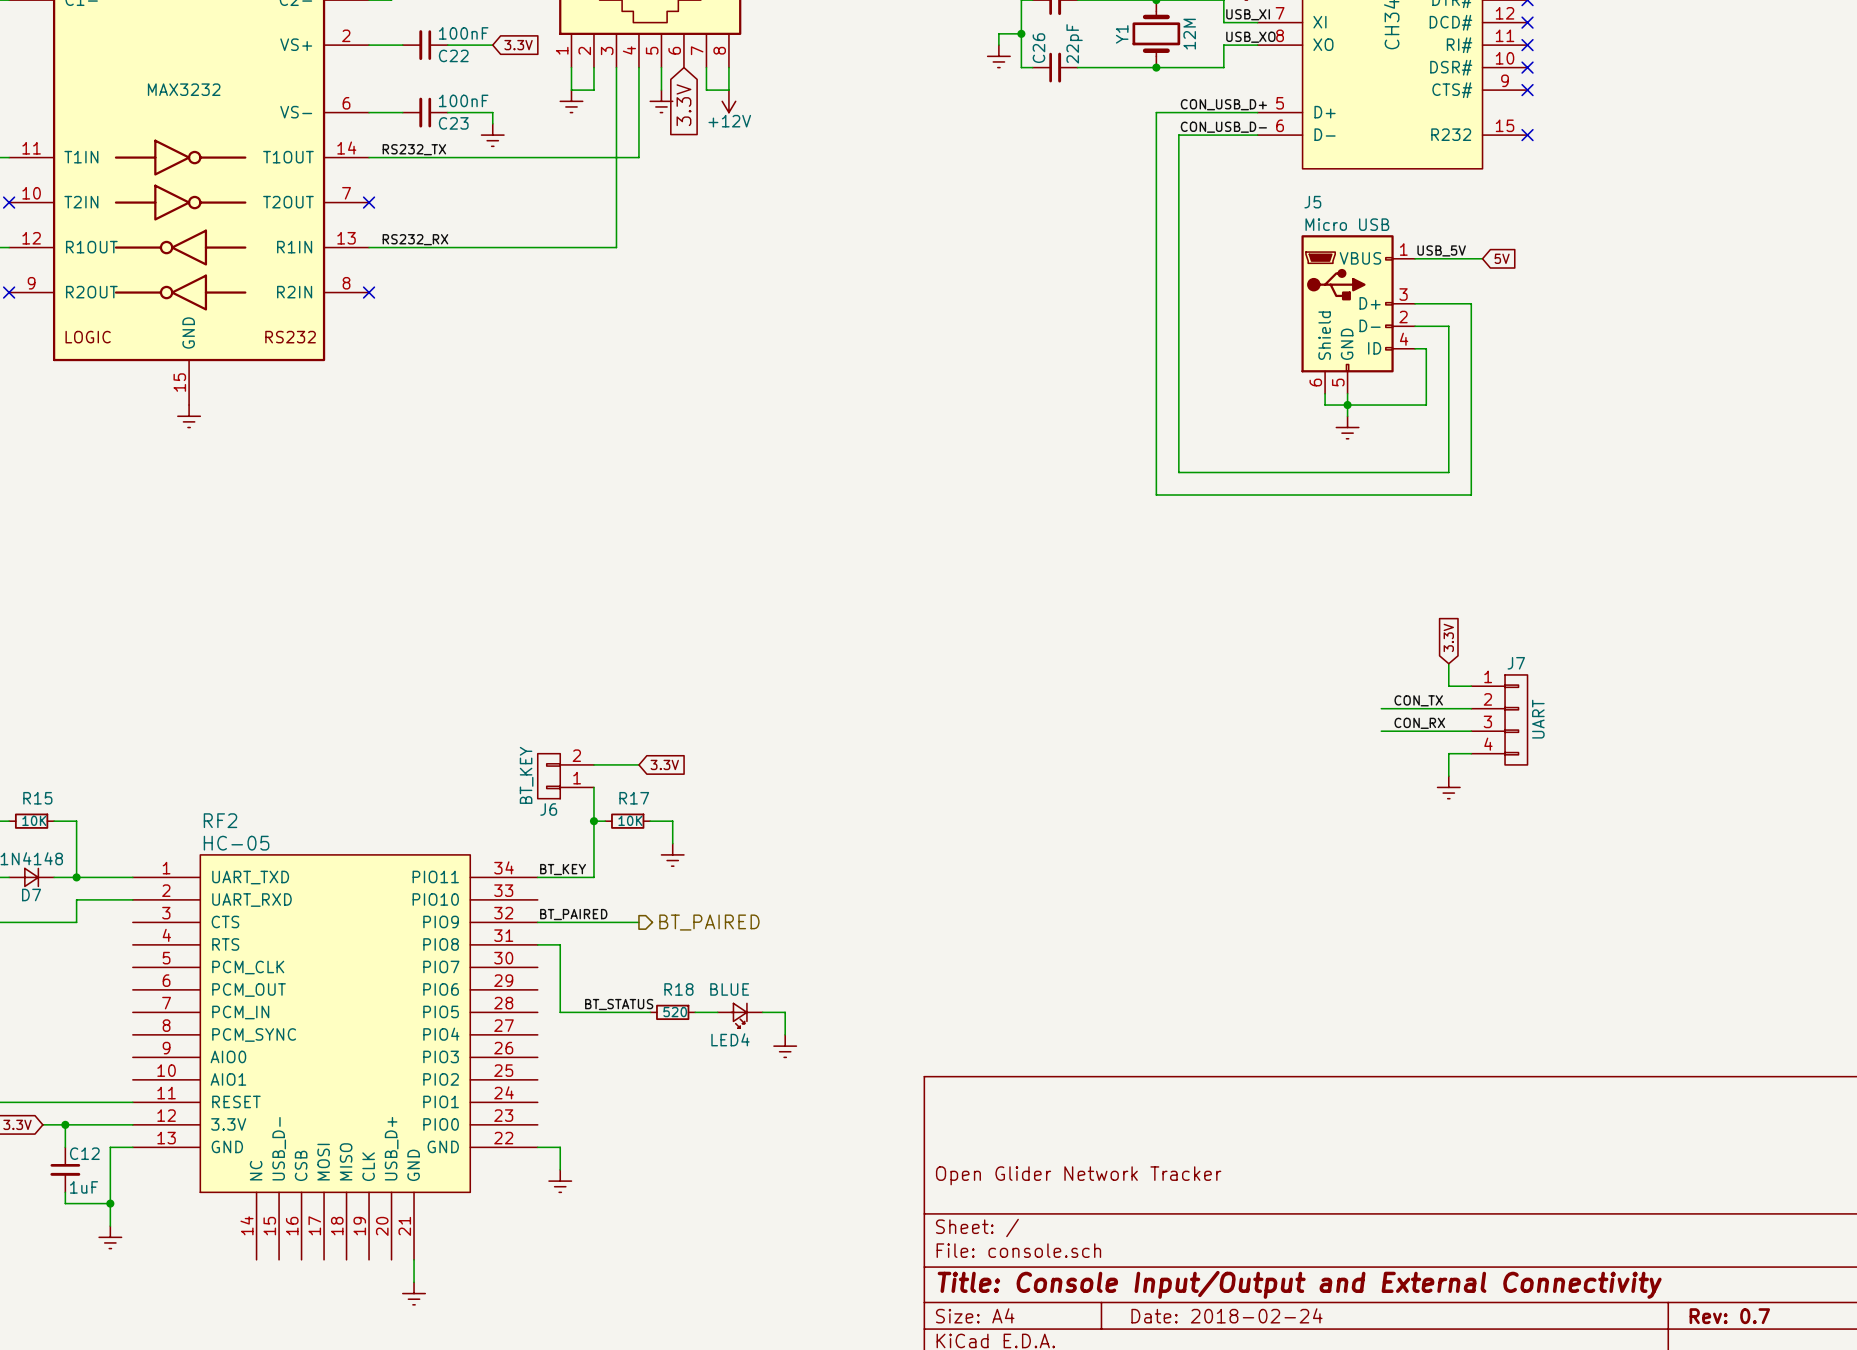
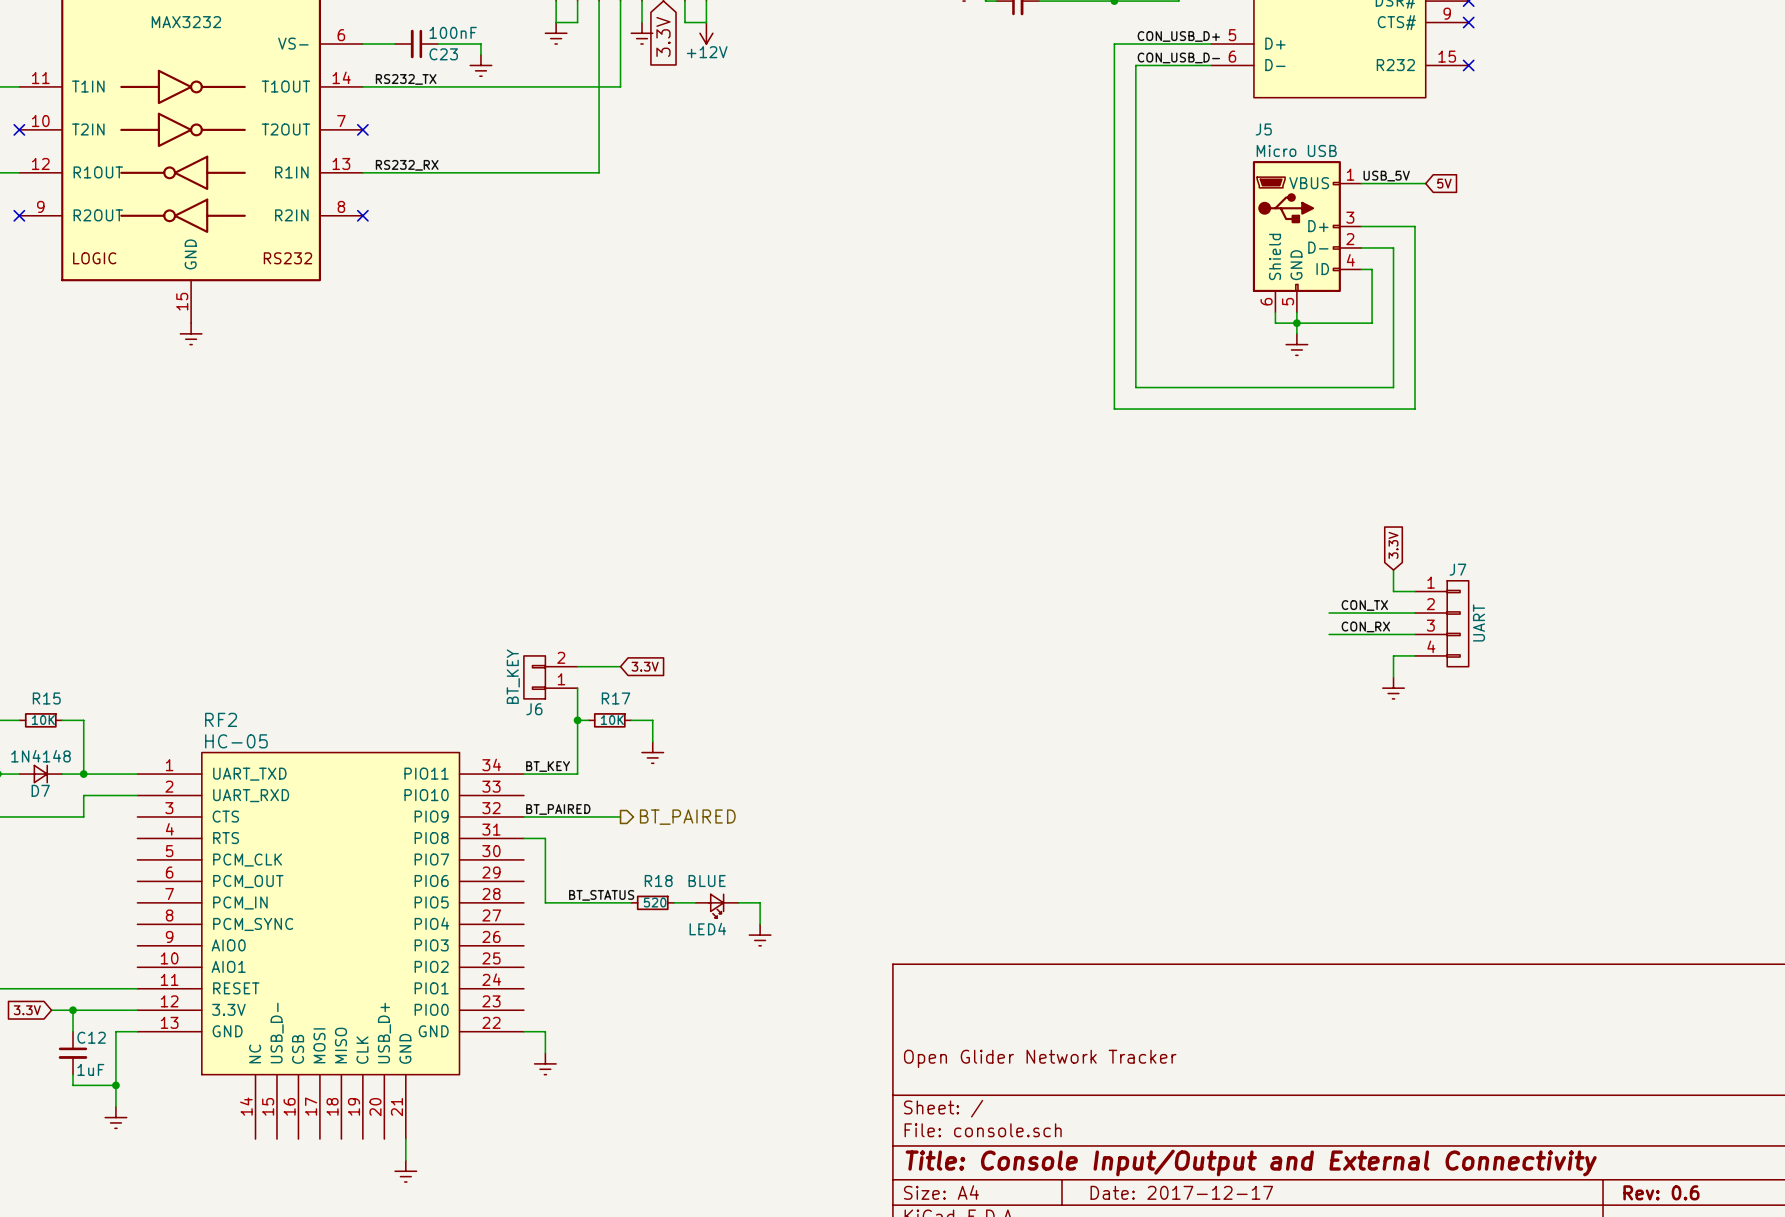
title block: Date: 2018-02-24 (1226, 1315) -> Date: 2017-12-17 (1181, 1192)
title block: Rev: 0.7 (1729, 1316) -> Rev: 0.6 (1661, 1192)

